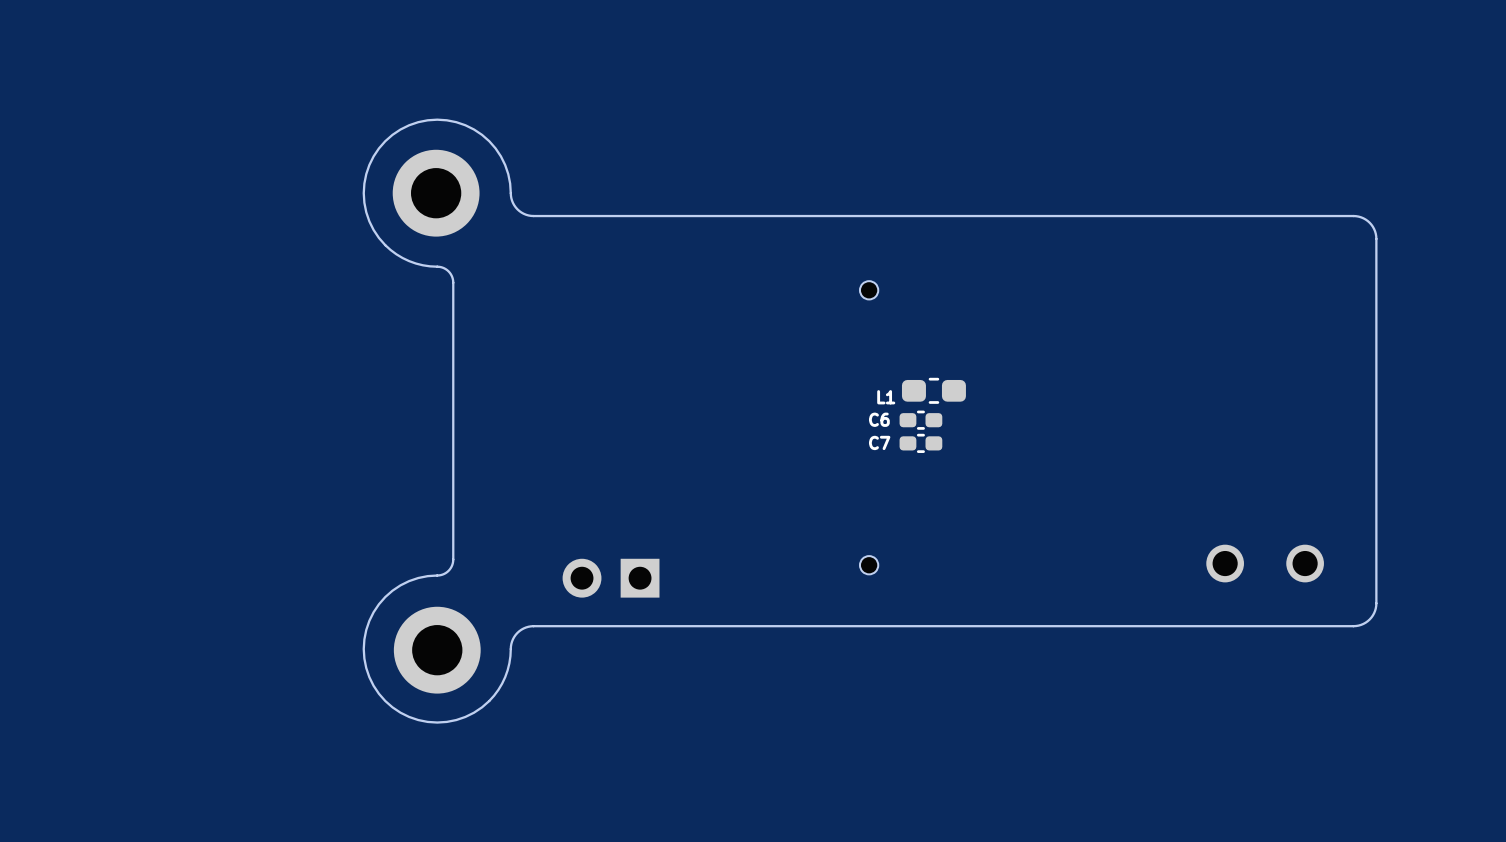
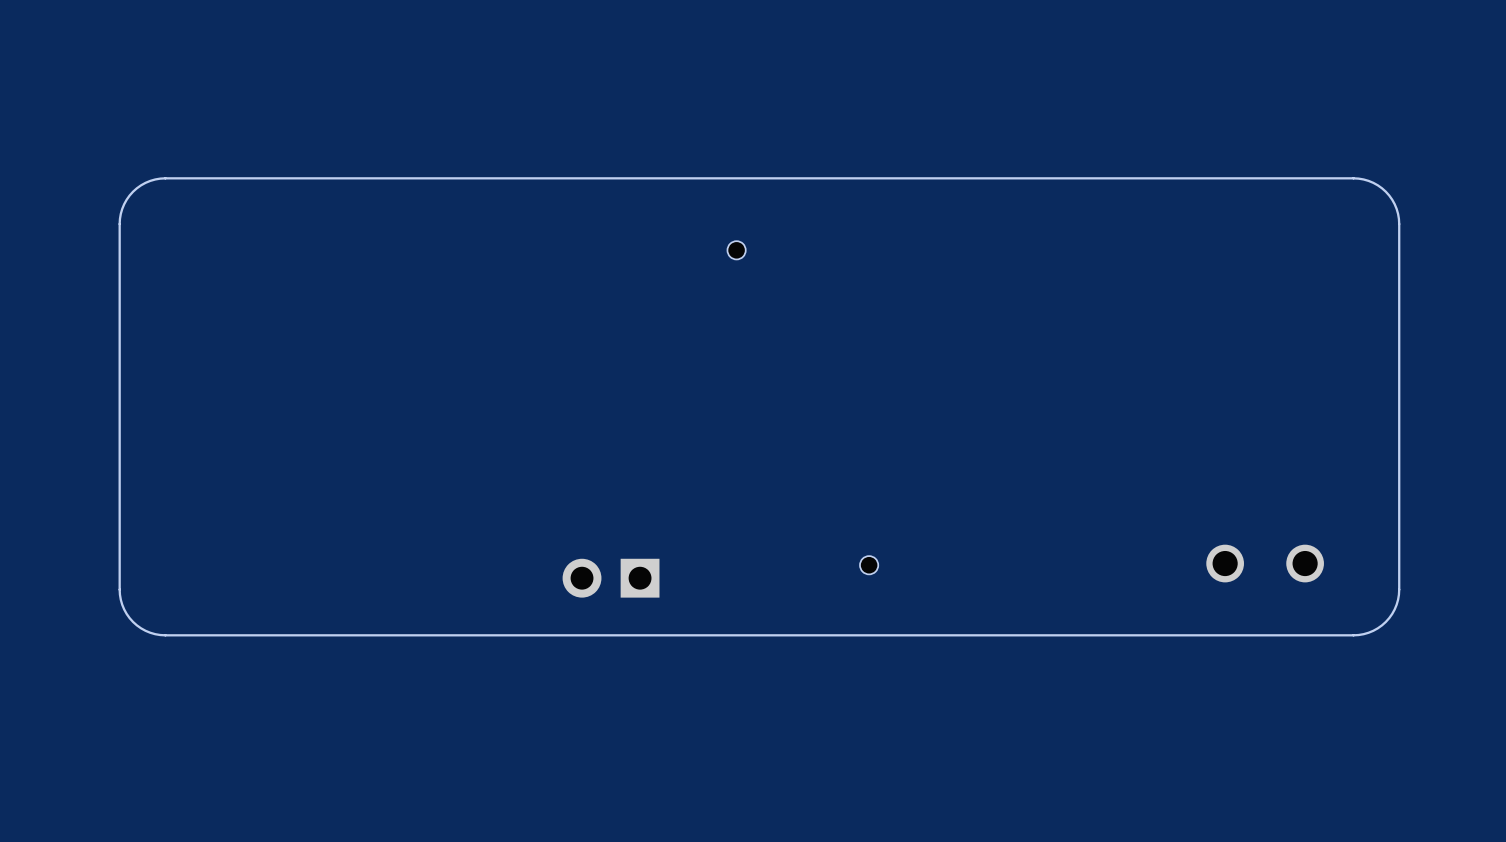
part: (436, 193) -> none
board edge: (510, 193) (505, 165) (489, 141) (465, 125) (437, 119) (409, 125) (385, 141) (369, 165) (364, 183) (366, 212) (373, 229) (385, 245) (409, 261) (444, 268) (449, 272) (453, 280) (452, 563) (449, 569) (444, 573) (418, 578) (392, 590) (373, 612) (364, 639) (364, 658) (373, 685) (392, 707) (409, 716) (427, 721) (446, 721) (465, 716) (482, 707) (494, 695) (505, 677) (514, 636) (521, 629) (531, 626) (1353, 626) (1365, 622) (1374, 613) (1376, 603) (1376, 238) (1372, 226) (1363, 218) (1353, 216) (533, 216) (526, 214) (517, 209) (513, 203) (510, 193) -> (1353, 178) (1368, 180) (1385, 191) (1396, 208) (1399, 224) (1398, 594) (1396, 604) (1389, 618) (1382, 625) (1368, 632) (1353, 635) (165, 635) (155, 634) (141, 628) (129, 618) (122, 604) (119, 589) (119, 218) (122, 208) (129, 195) (141, 185) (150, 180) (165, 178) (1353, 178)
part position: (869, 290) -> (736, 250)
L1: (933, 390) -> none
C6: (920, 420) -> none
C7: (920, 443) -> none
part: (437, 650) -> none

